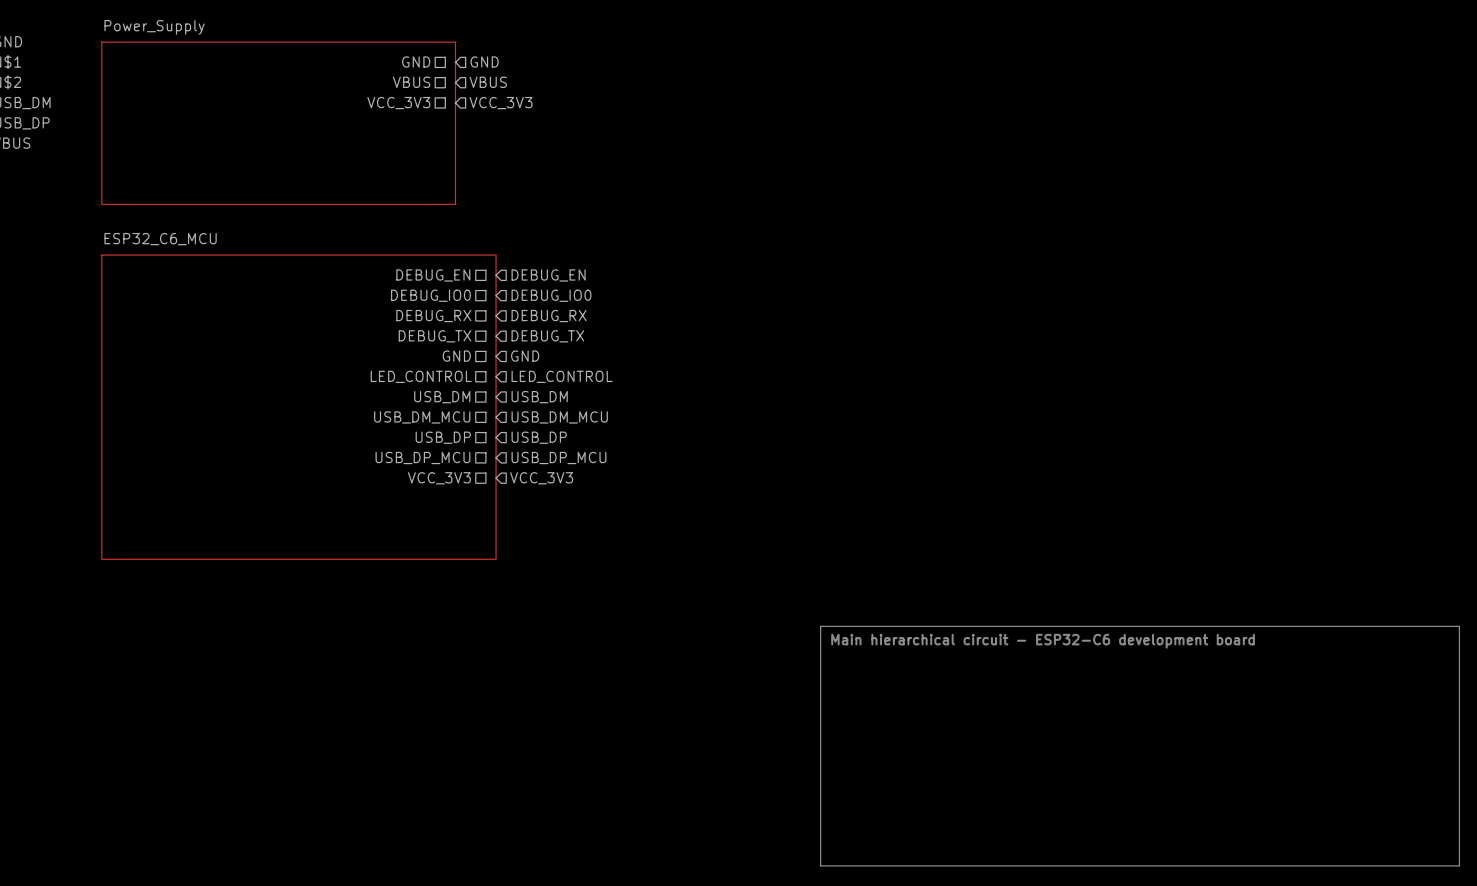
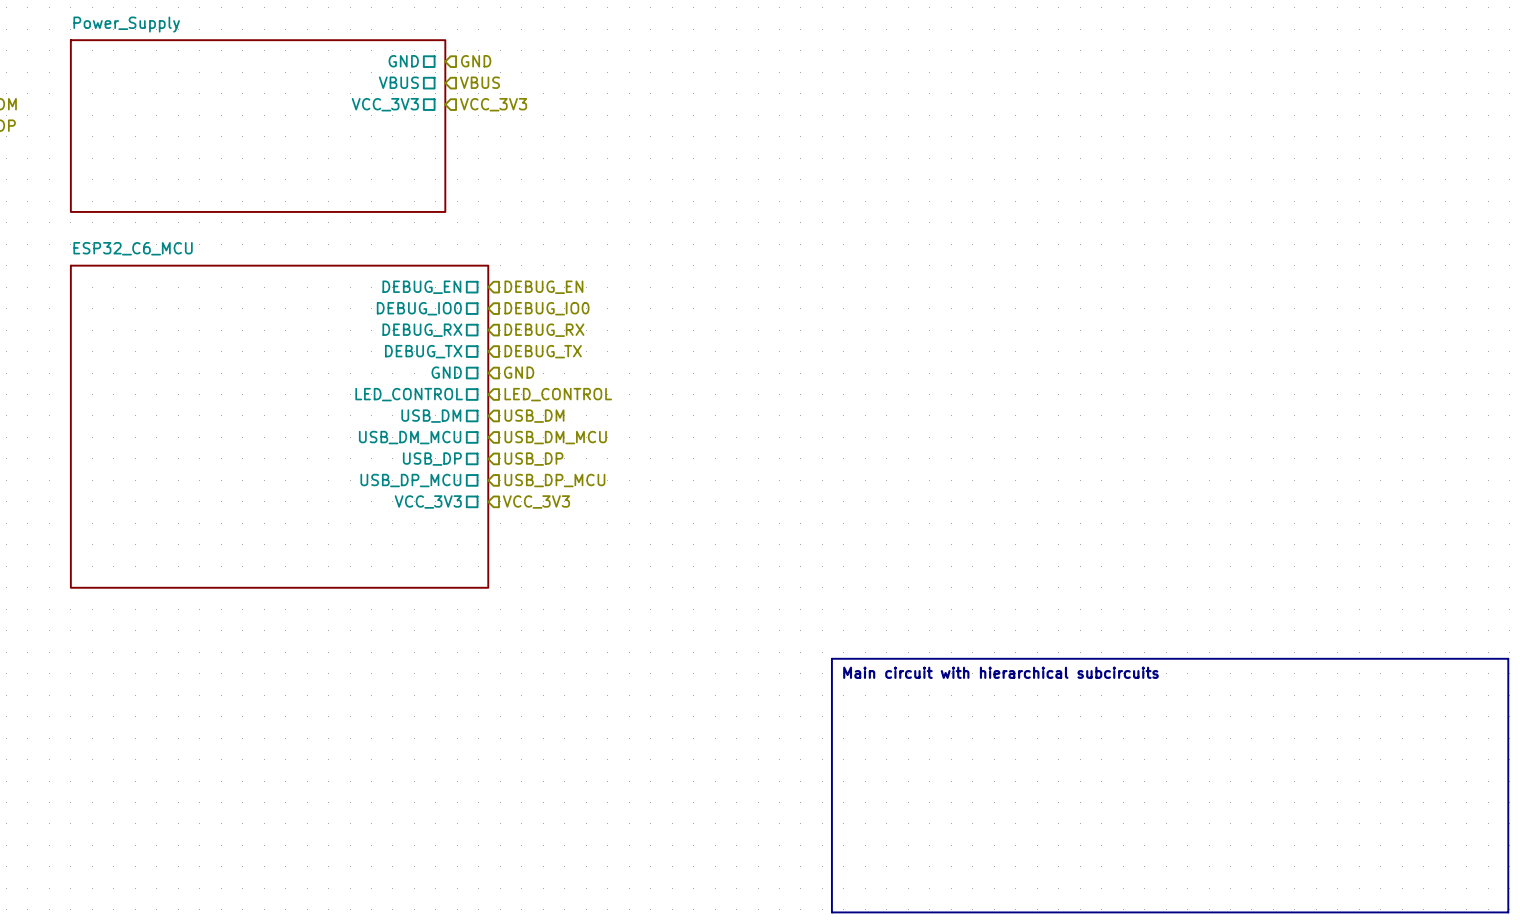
text: Main hierarchical circuit - ESP32-C6 development board (1043, 641) -> Main circuit with hierarchical subcircuits (1000, 672)

